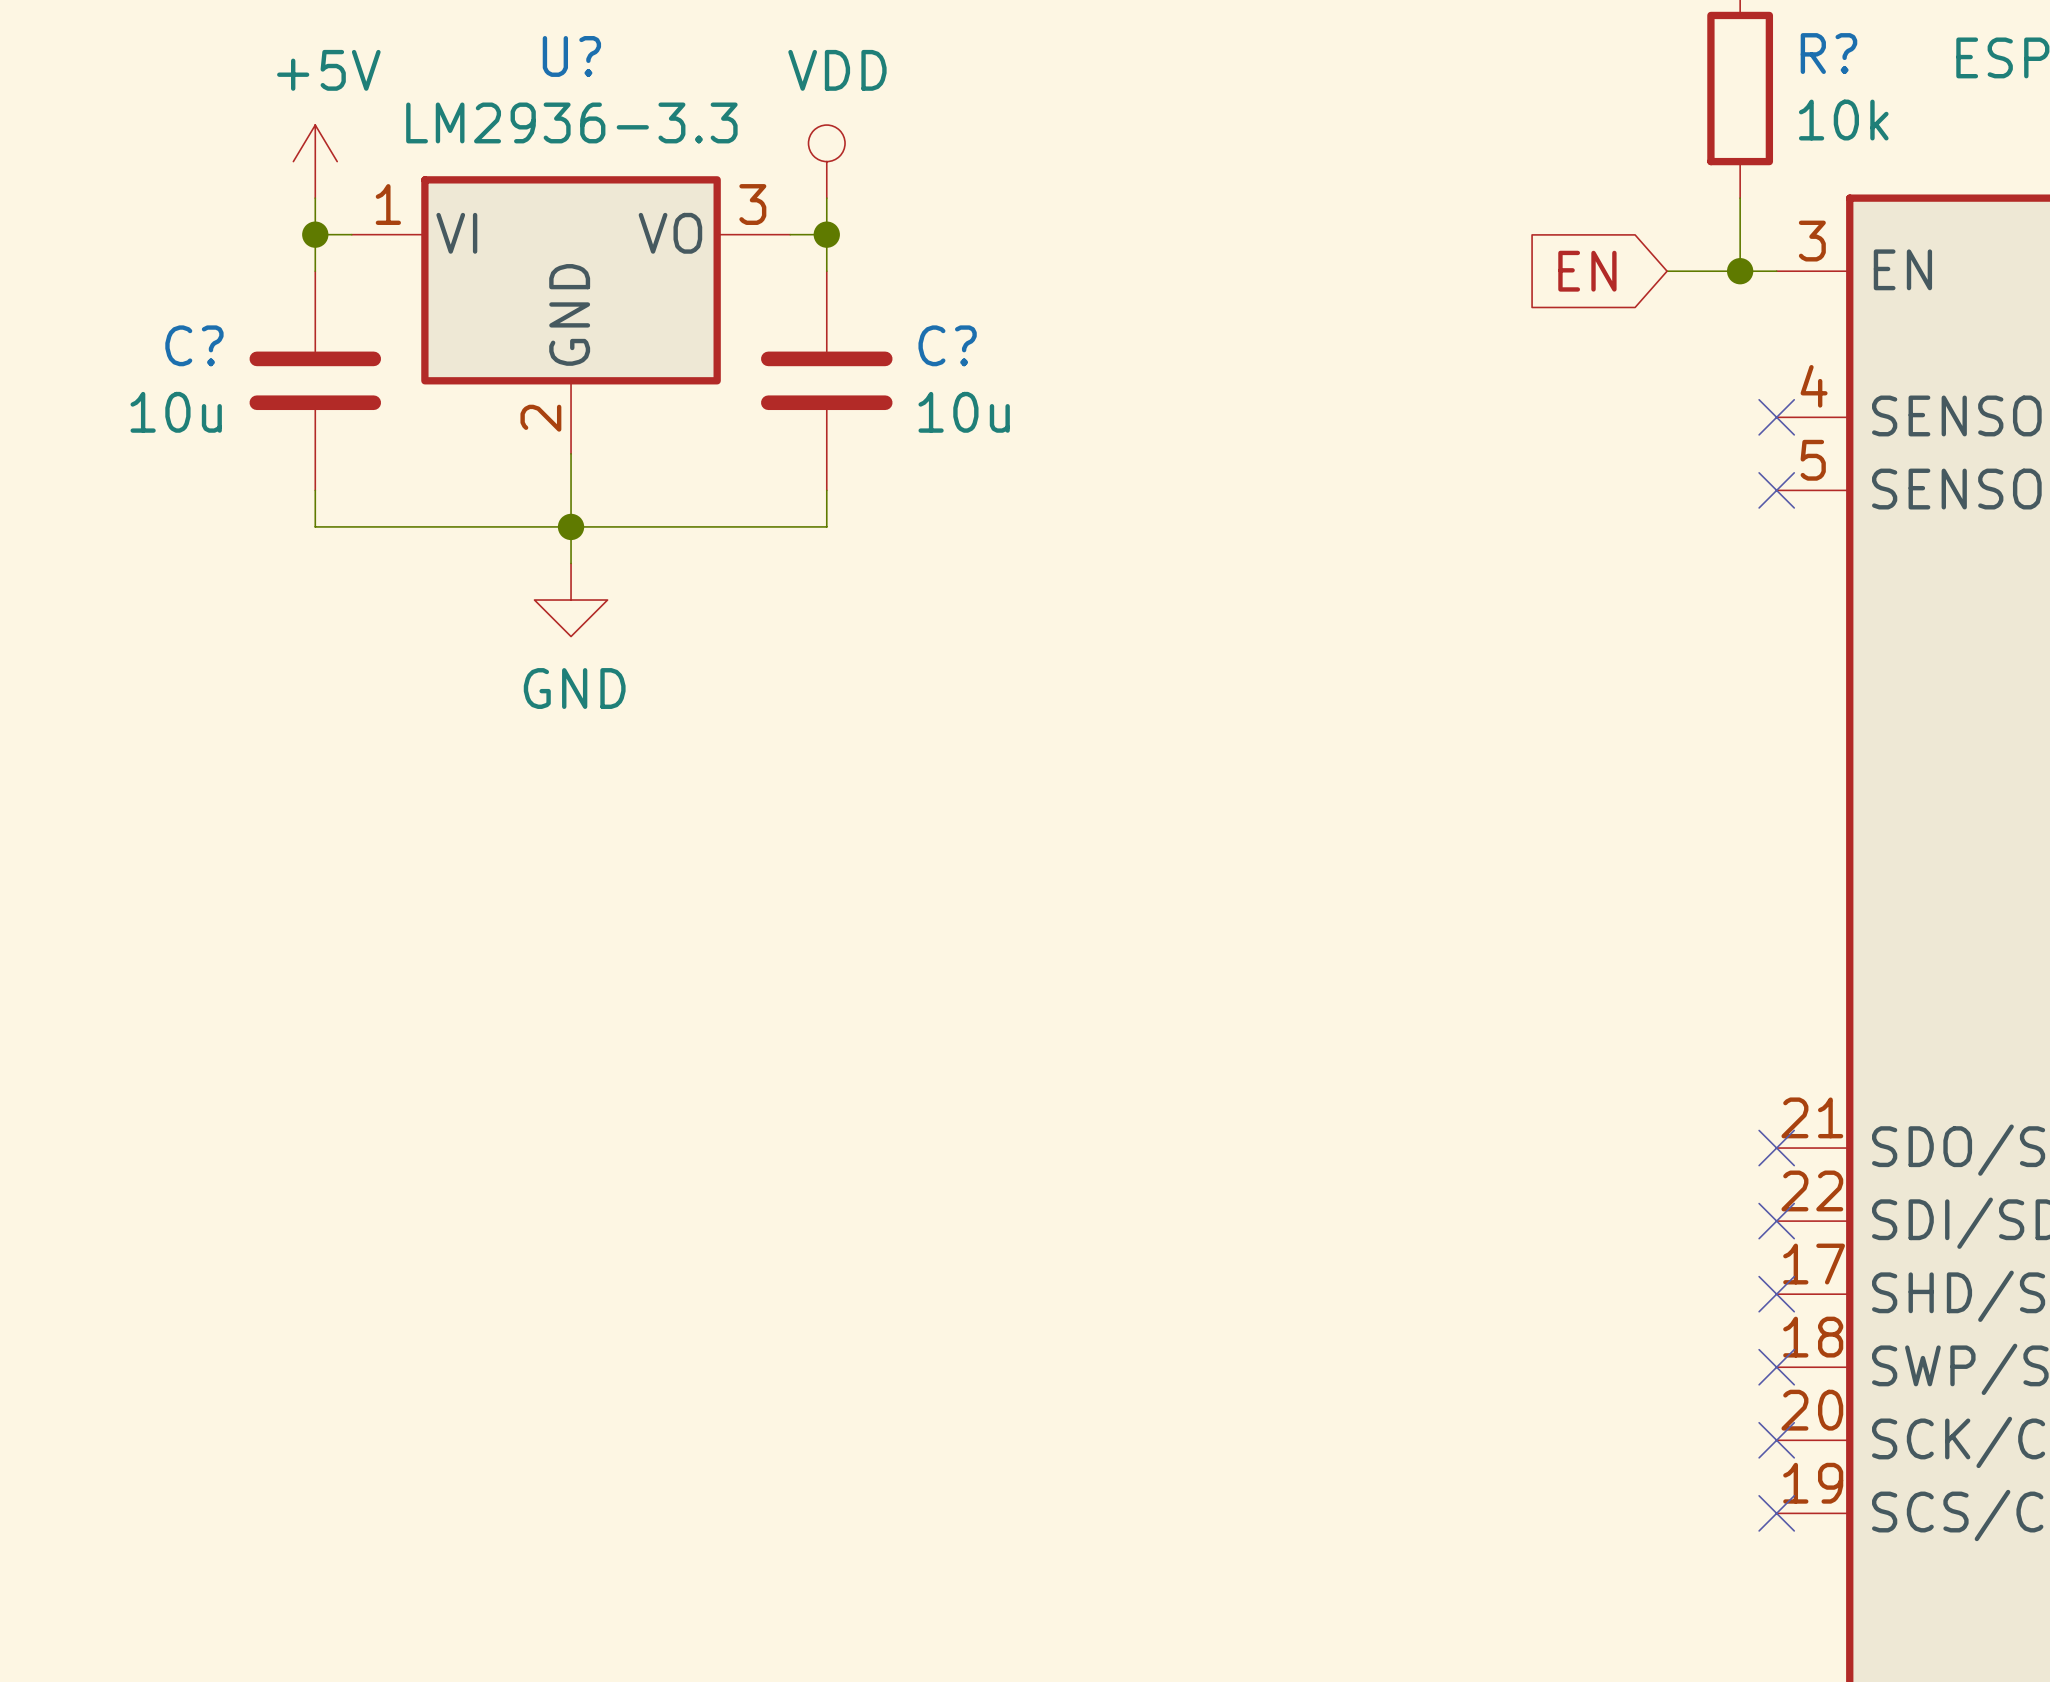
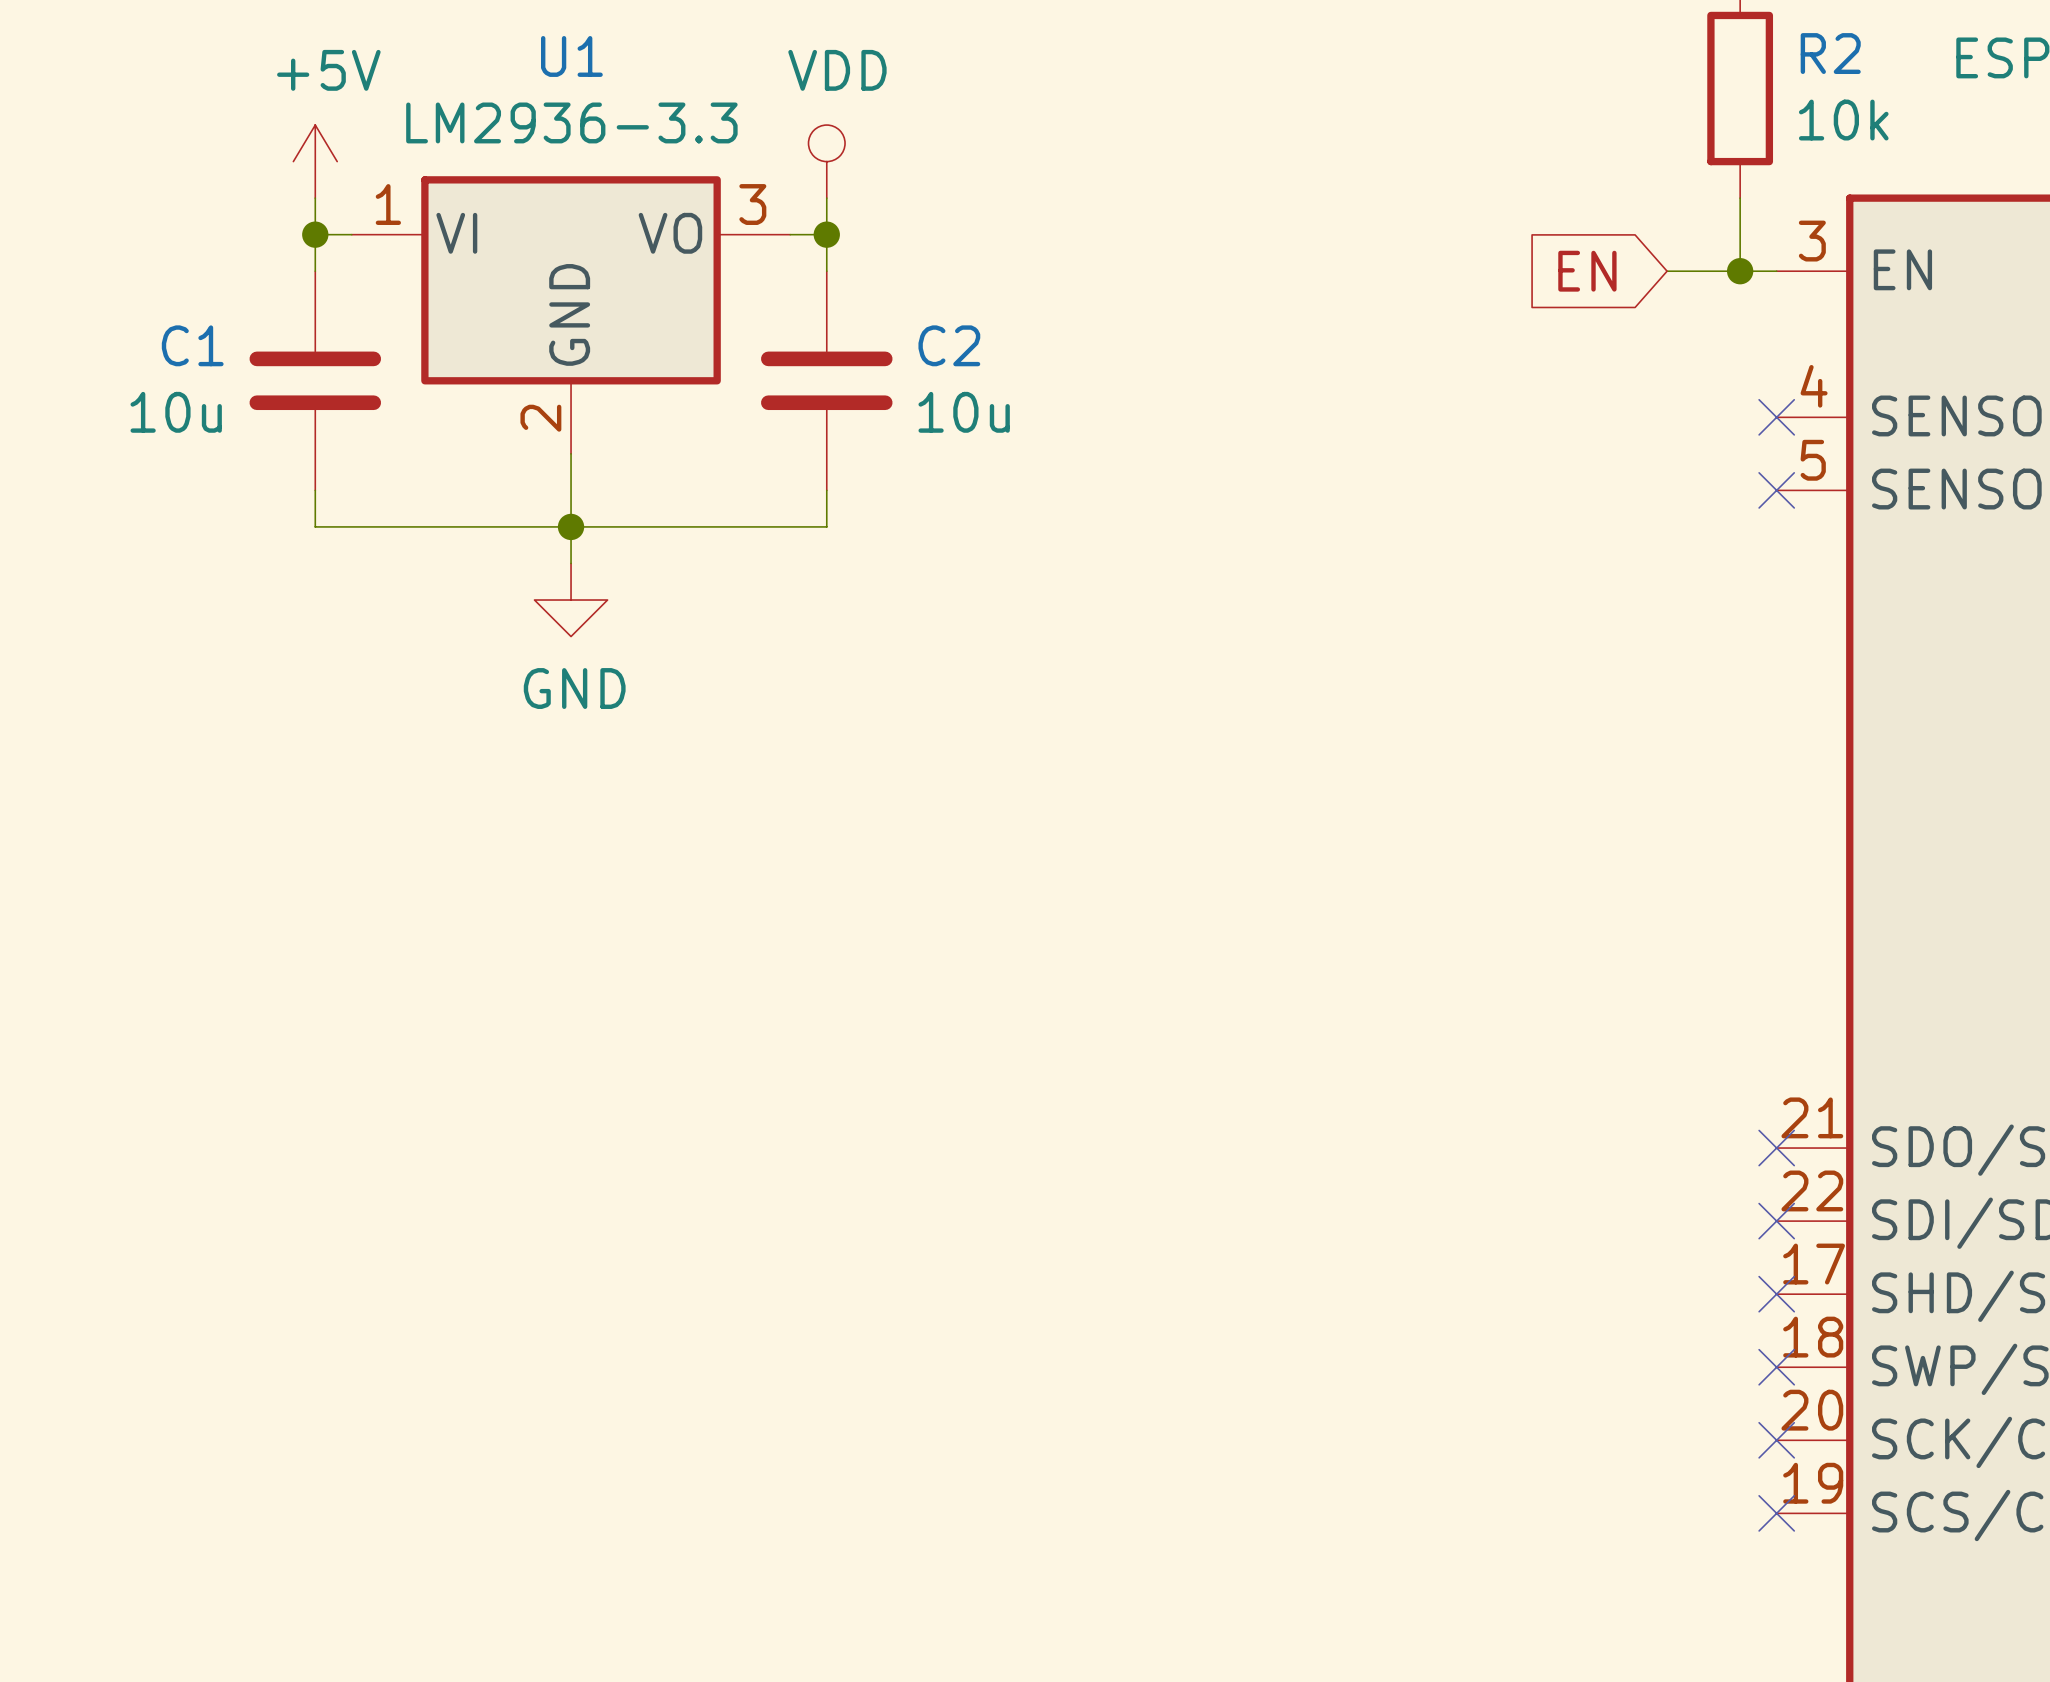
R? name: R? (1828, 53) -> R2 (1830, 53)
U? name: U? (571, 56) -> U1 (571, 56)
C? name: C? (194, 345) -> C1 (192, 345)
C? name: C? (947, 345) -> C2 (949, 345)

